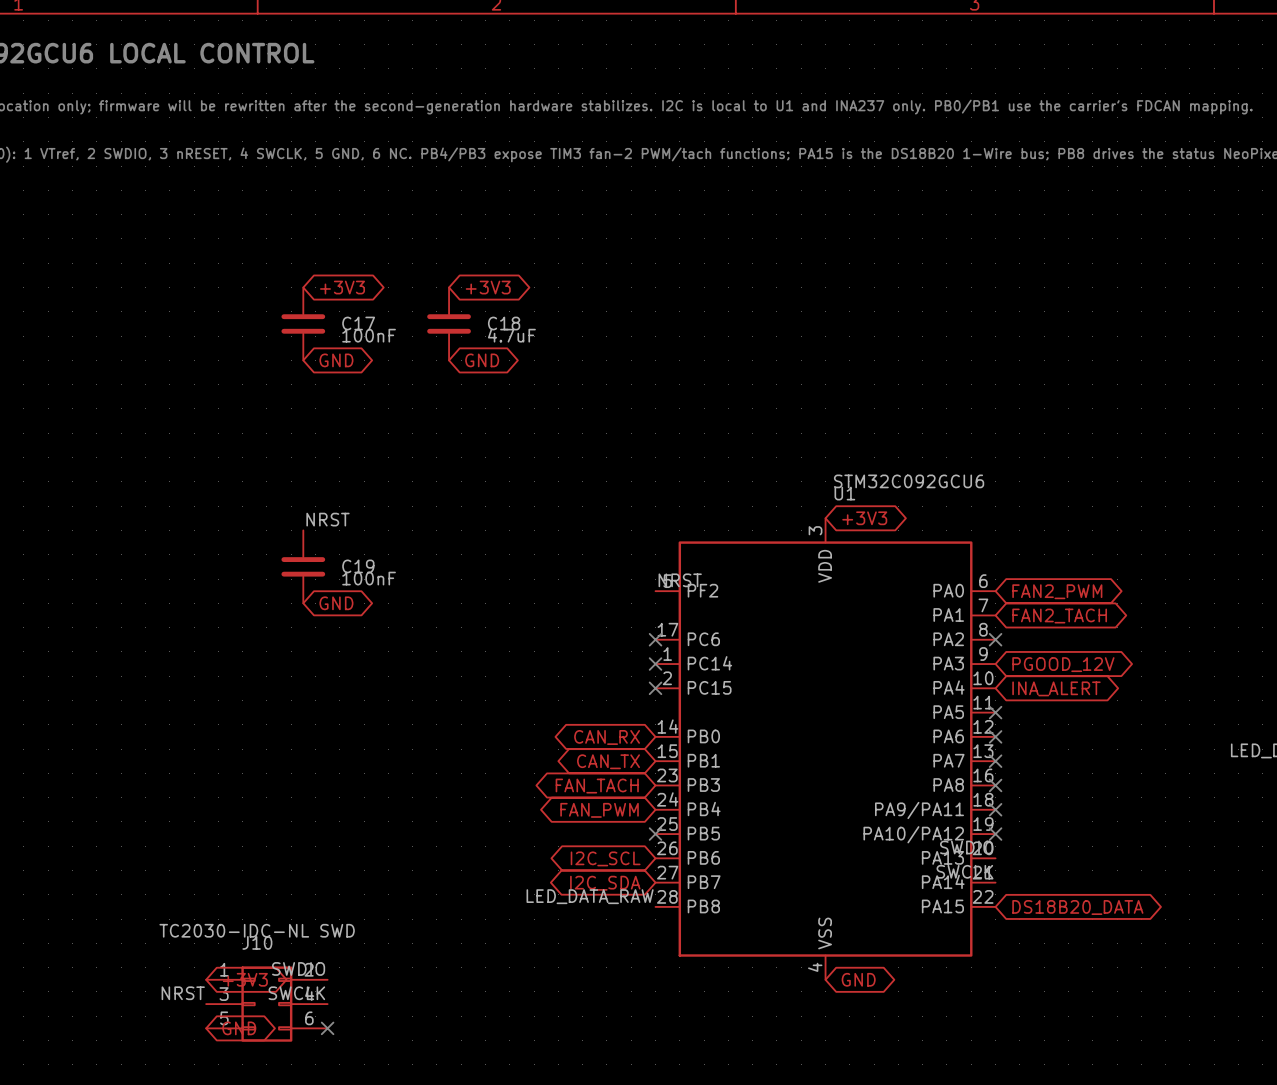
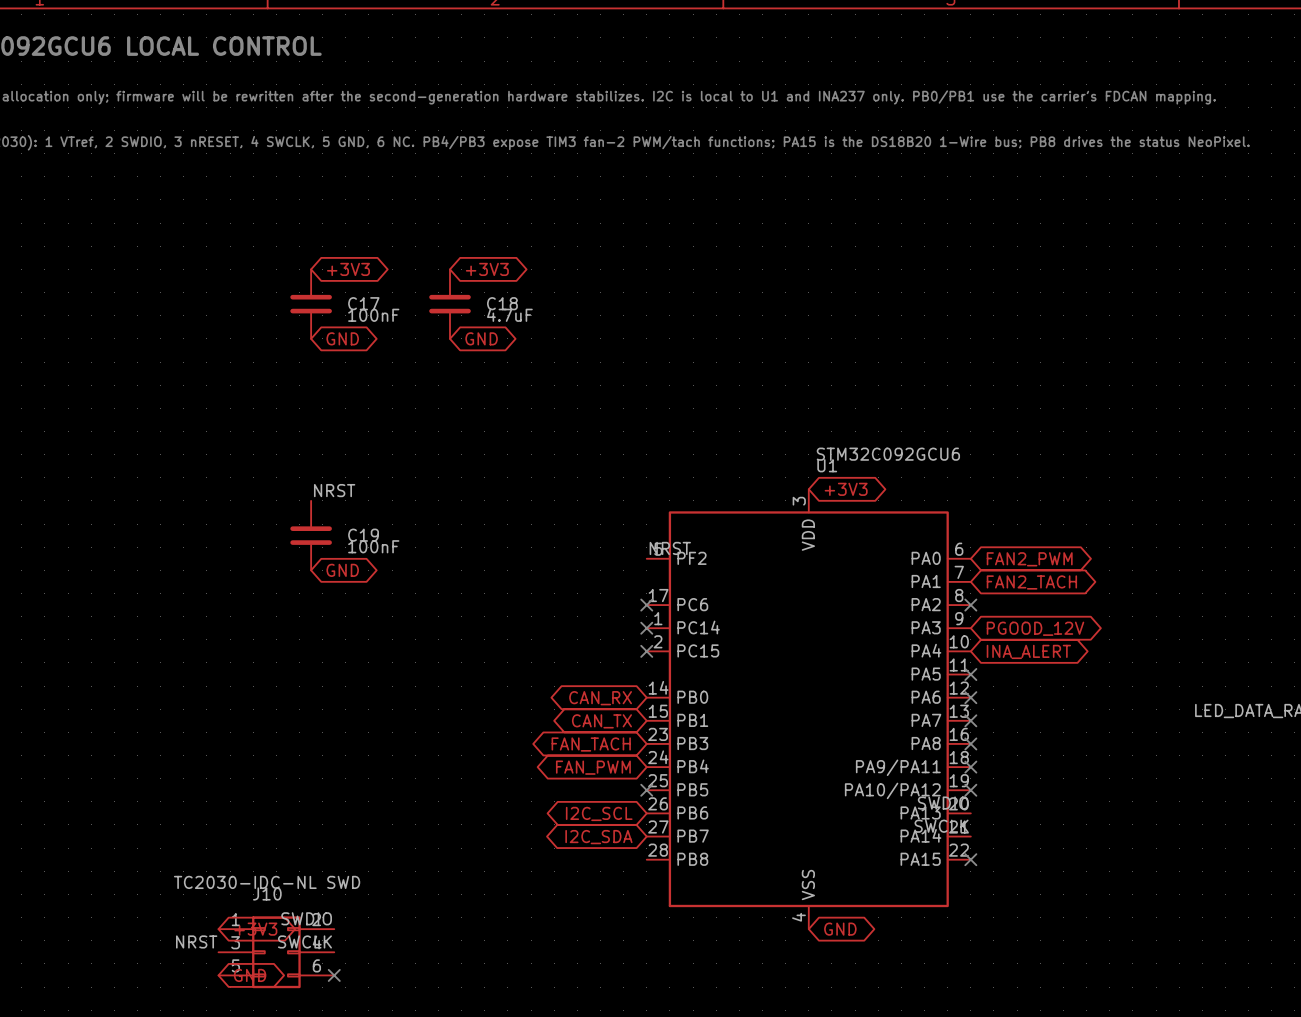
label: LED_DATA_RAW (590, 896) -> none
no-connect mark: none -> (970, 859)
global label: DS18B20_DATA (1077, 907) -> none

